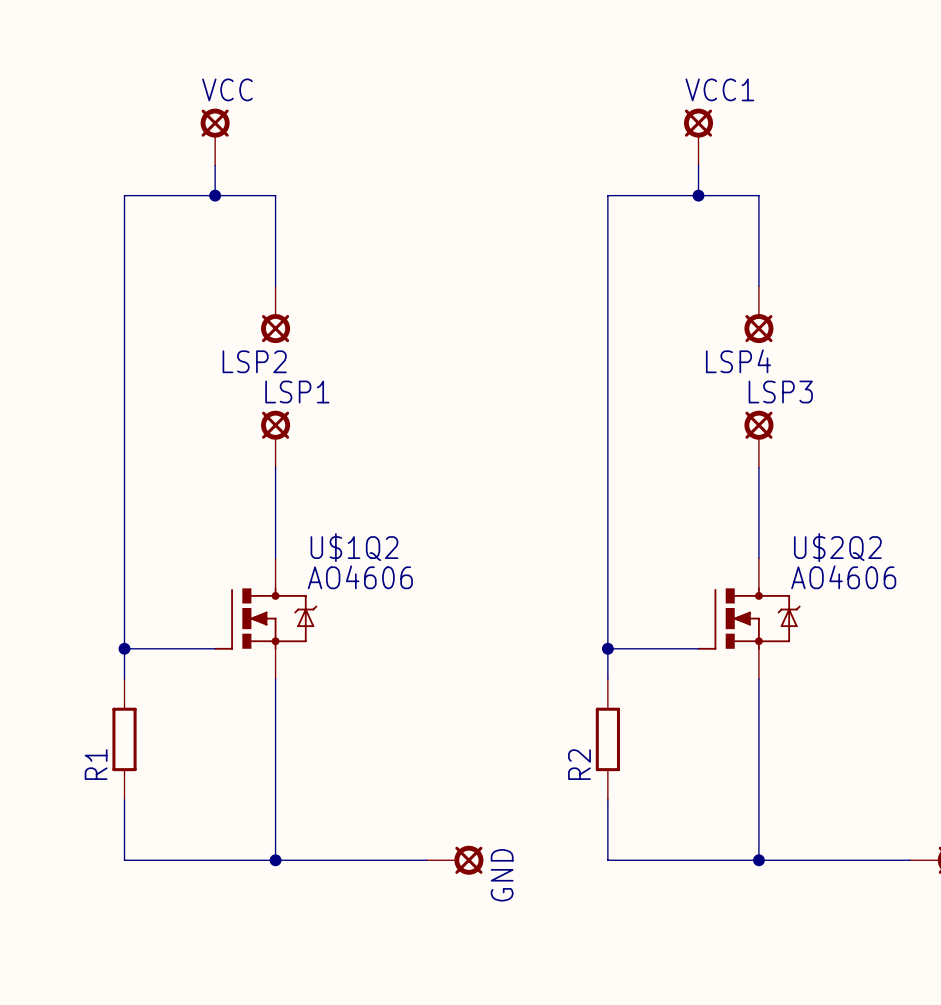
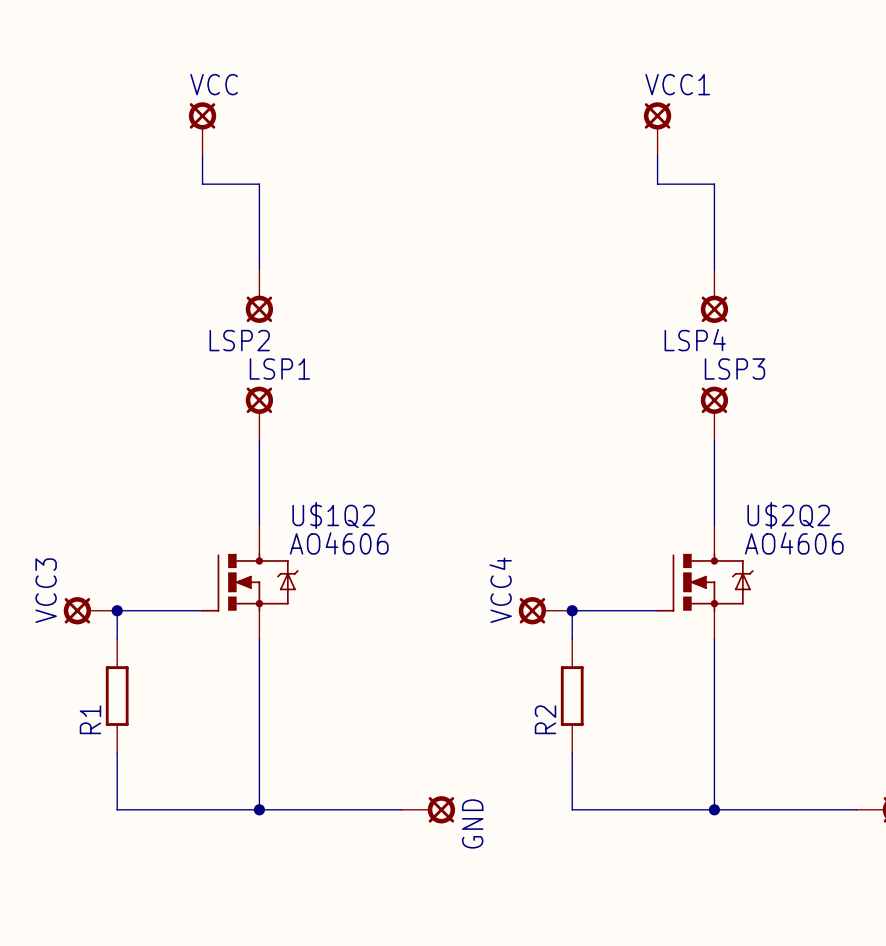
wire: (215, 195) (124, 195) (124, 648) -> none
junction: (215, 195) -> none
wire: (698, 195) (607, 195) (607, 648) -> none
junction: (698, 195) -> none
VCC3: none -> (90, 610)
VCC4: none -> (545, 610)

